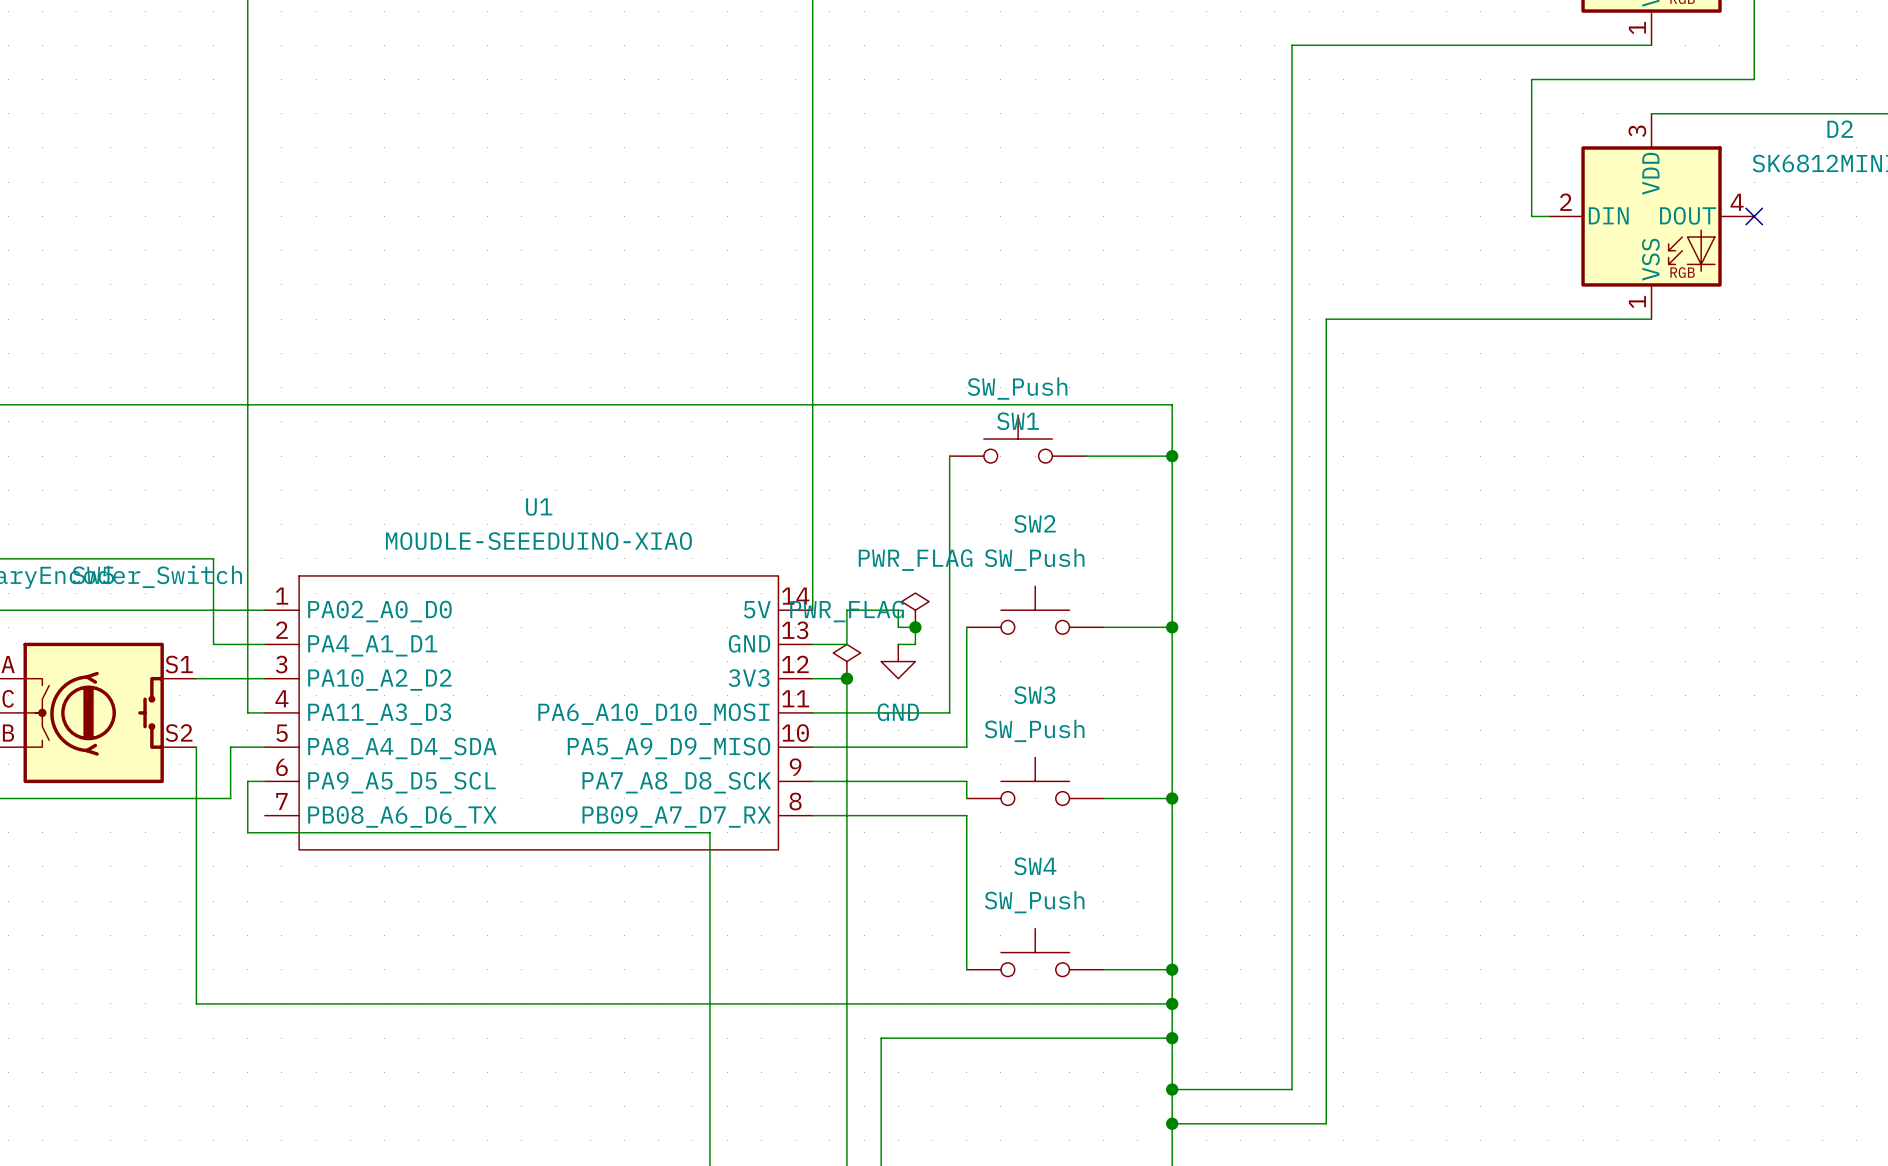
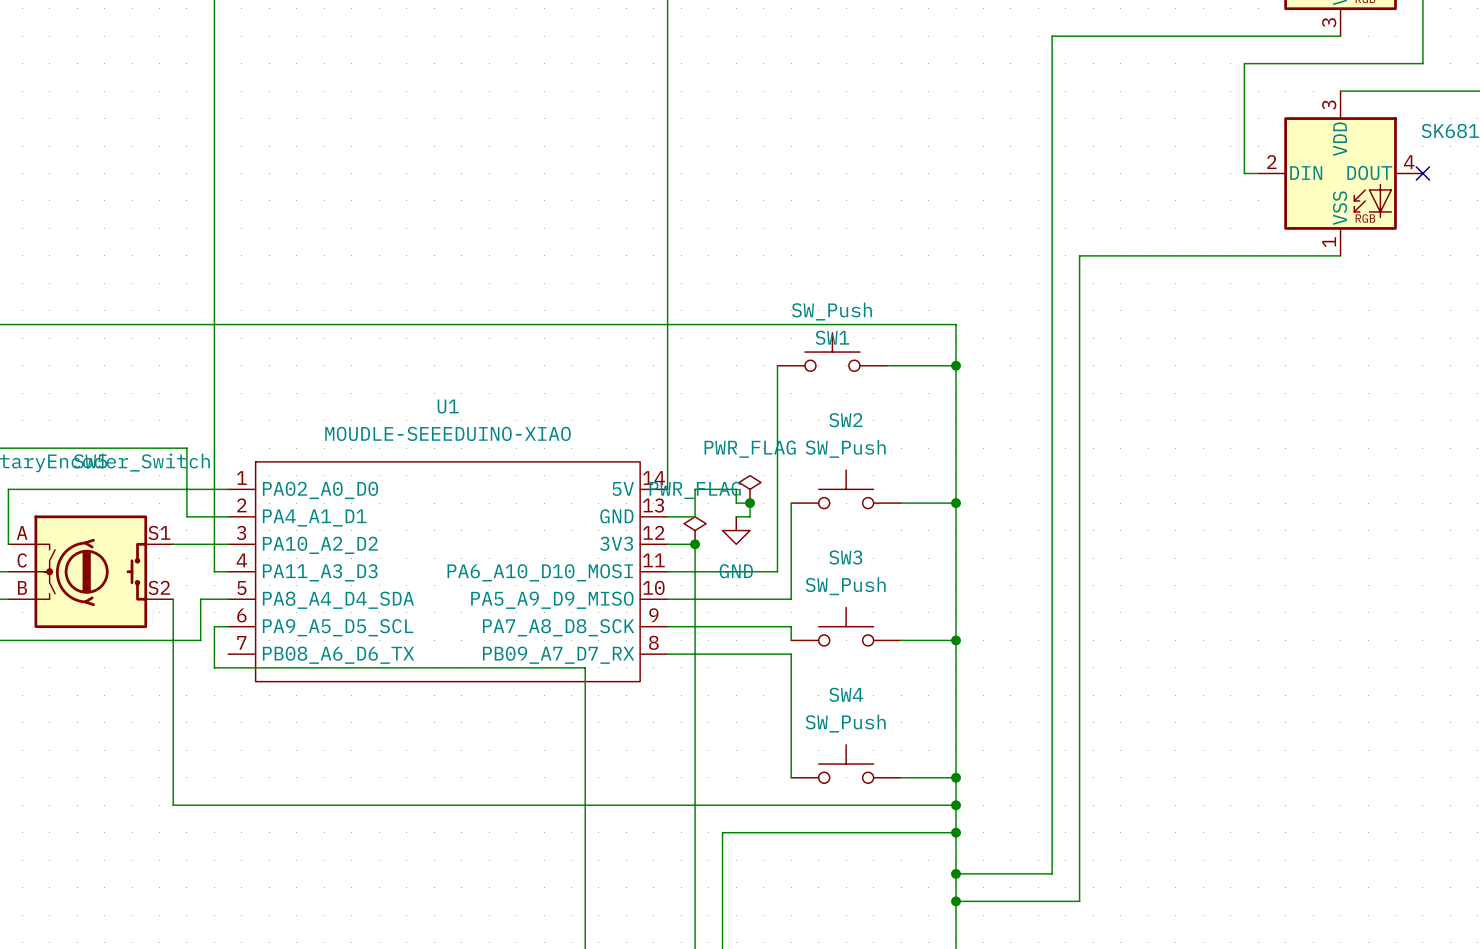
part pin number: 1 (1637, 28) -> 3 (1329, 22)

